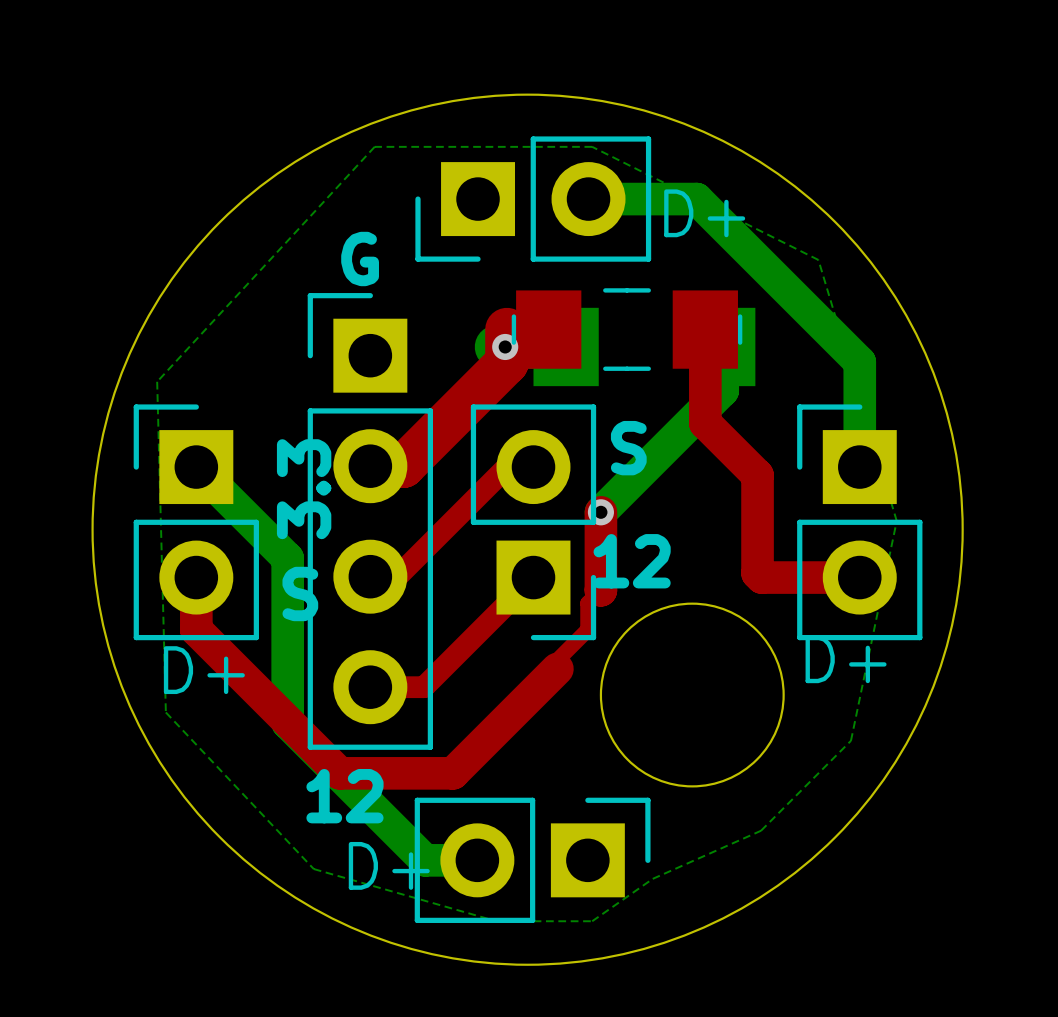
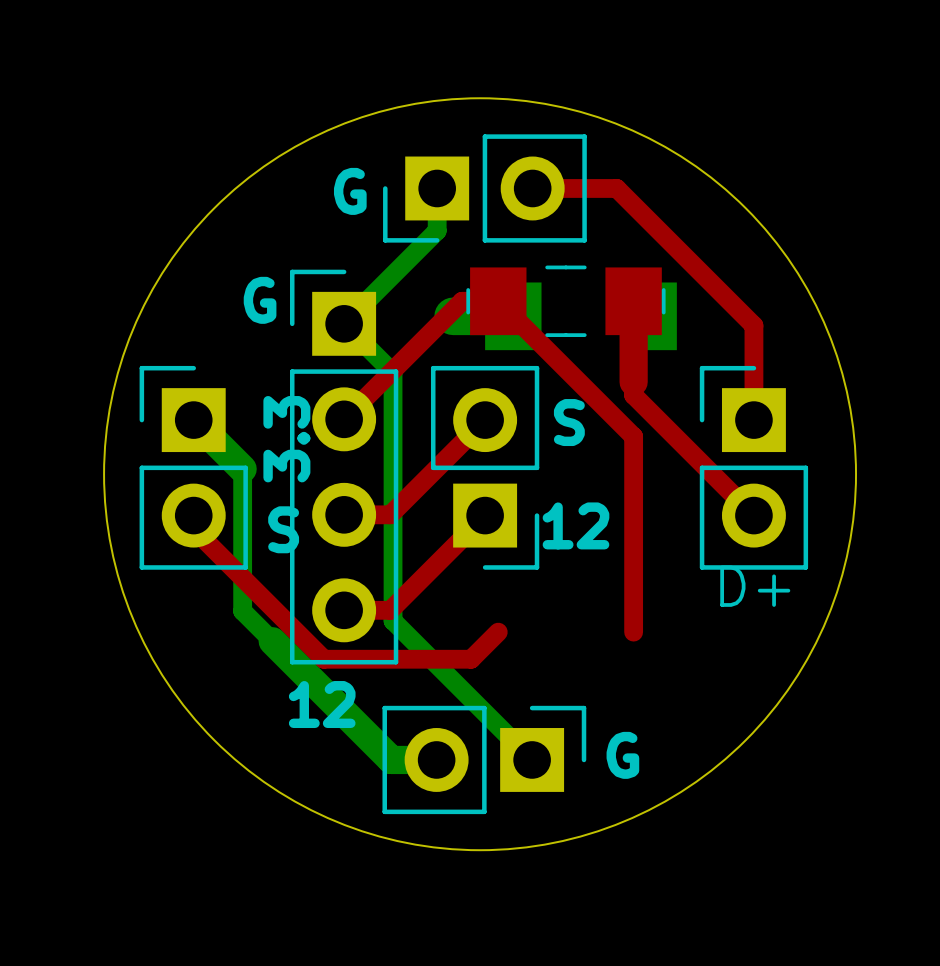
bottom zone outline: (374, 146) (592, 146) (818, 259) (896, 521) (850, 740) (761, 830) (652, 878) (592, 921) (496, 921) (313, 869) (165, 712) (157, 381) (374, 146) -> none
bottom track: none -> (437, 188) (437, 230) (344, 323) (393, 372) (393, 620) (532, 759)
top track: none -> (532, 188) (616, 188) (753, 325) (753, 420)
bottom track: (588, 199) (696, 199) (859, 362) (859, 467) -> none
text: D+ (704, 213) -> none
text position: G (360, 259) -> G (350, 191)
text: none -> G (260, 300)
top track: (506, 329) (506, 362) (403, 466) (370, 466) -> (462, 301) (344, 419)
top track: none -> (498, 301) (633, 436) (633, 632)
via: (505, 346) -> none
bottom track: (722, 346) (722, 390) (600, 512) -> none
top track: (705, 423) (757, 475) (757, 573) (761, 577) (859, 577) -> (633, 382) (633, 395) (753, 515)
text position: S (628, 448) -> S (569, 422)
top track: (533, 467) (506, 467) (397, 576) -> (485, 420) (390, 514) (367, 514)
top track: (600, 512) (600, 590) (587, 603) (587, 629) (557, 660) (557, 668) (453, 773) (339, 773) (196, 629) (196, 577) -> none
via: (600, 512) -> none
part position: (859, 522) -> (753, 467)
bottom track: (252, 523) (287, 558) (287, 722) -> (242, 469) (242, 611) (272, 641)
text position: 12 (632, 561) -> 12 (575, 525)
top track: none -> (193, 529) (323, 659) (471, 659) (498, 632)
round board edge: [599, 602, 785, 788] -> none
text: D+ (204, 670) -> none
text: none -> G (622, 755)
text: D+ (389, 865) -> none

